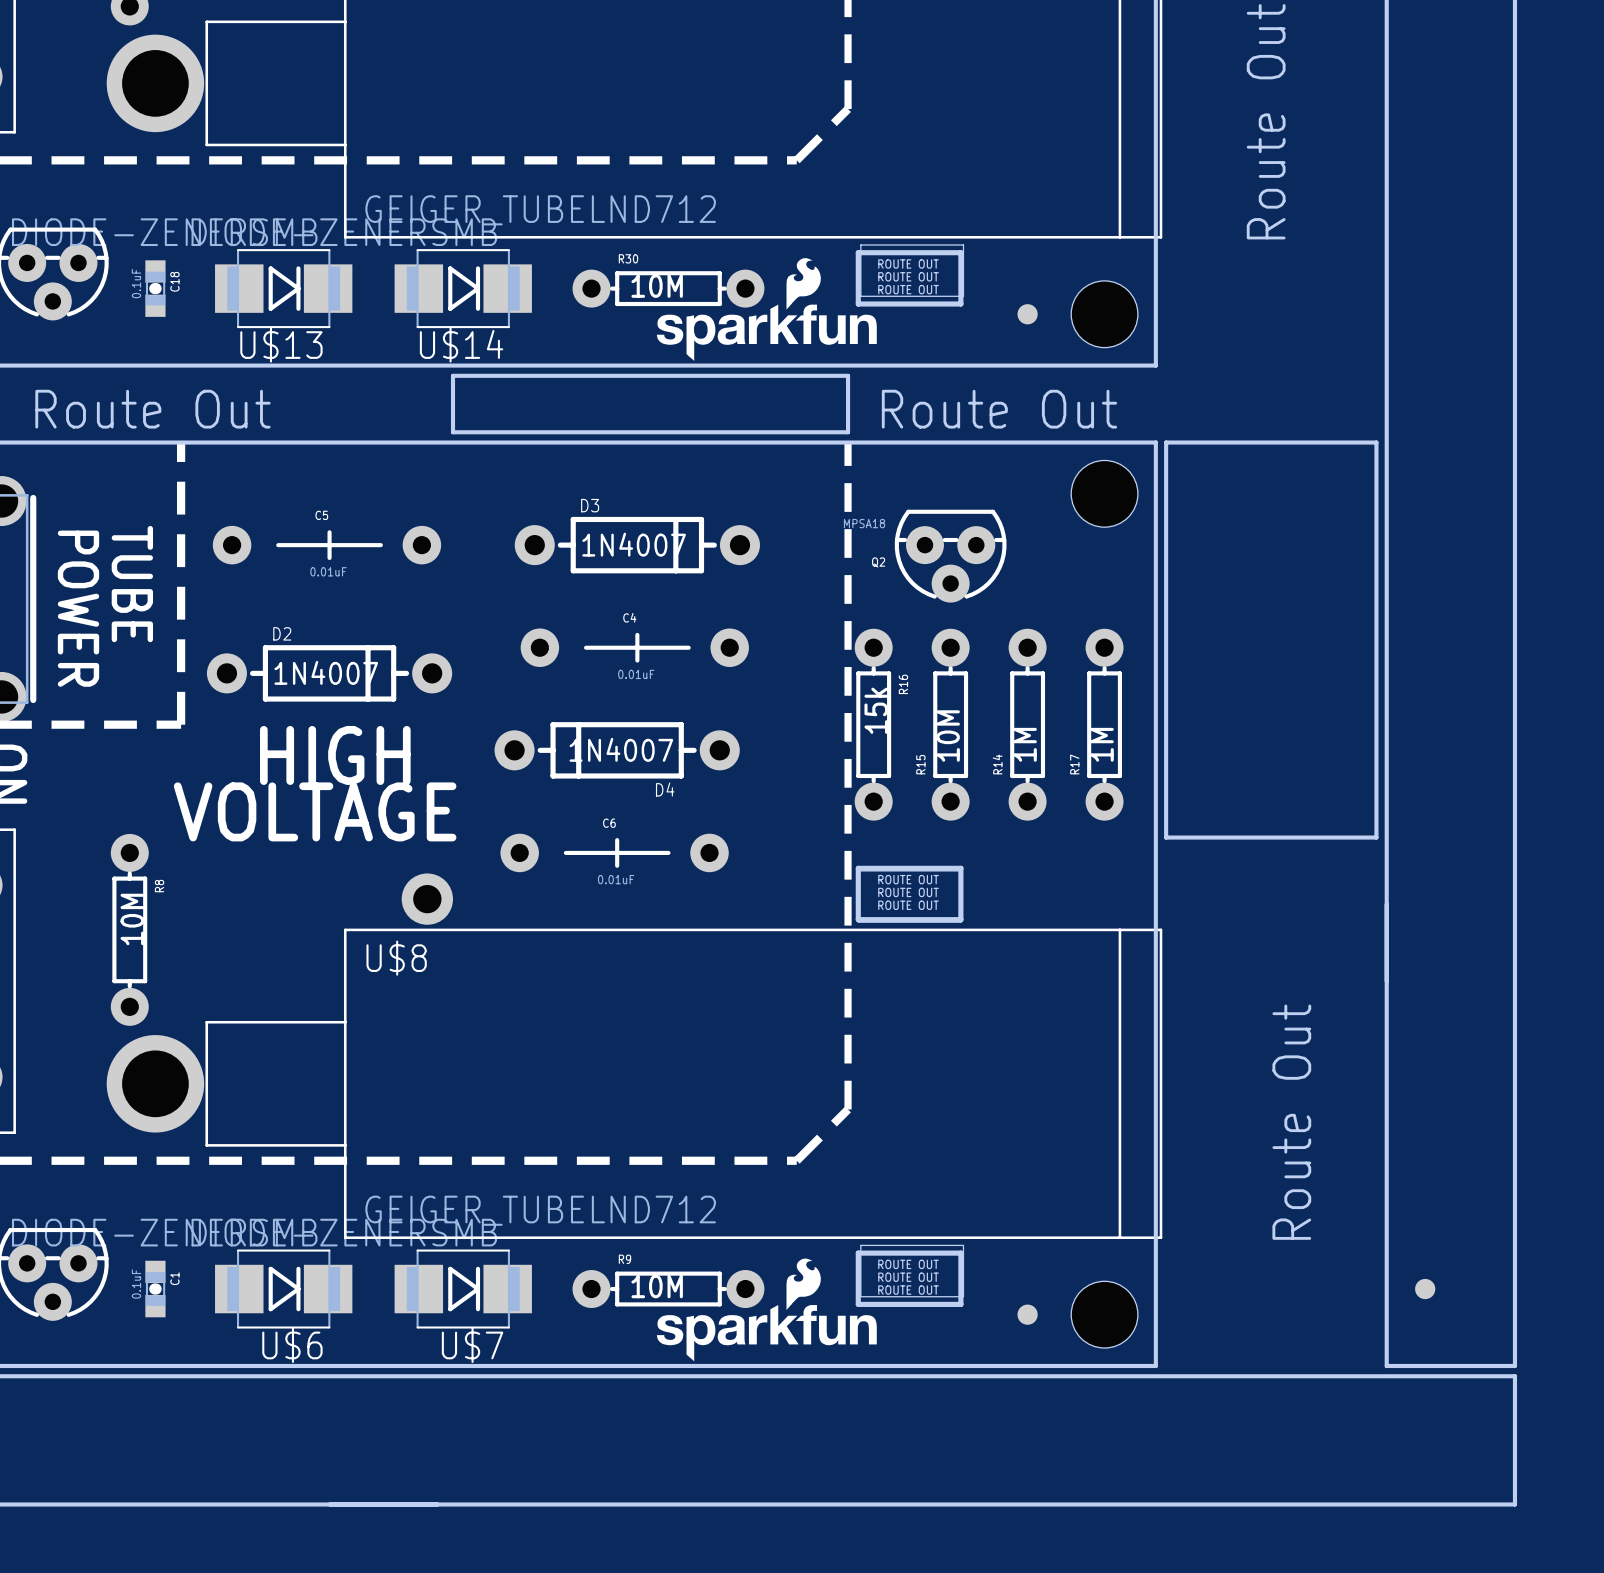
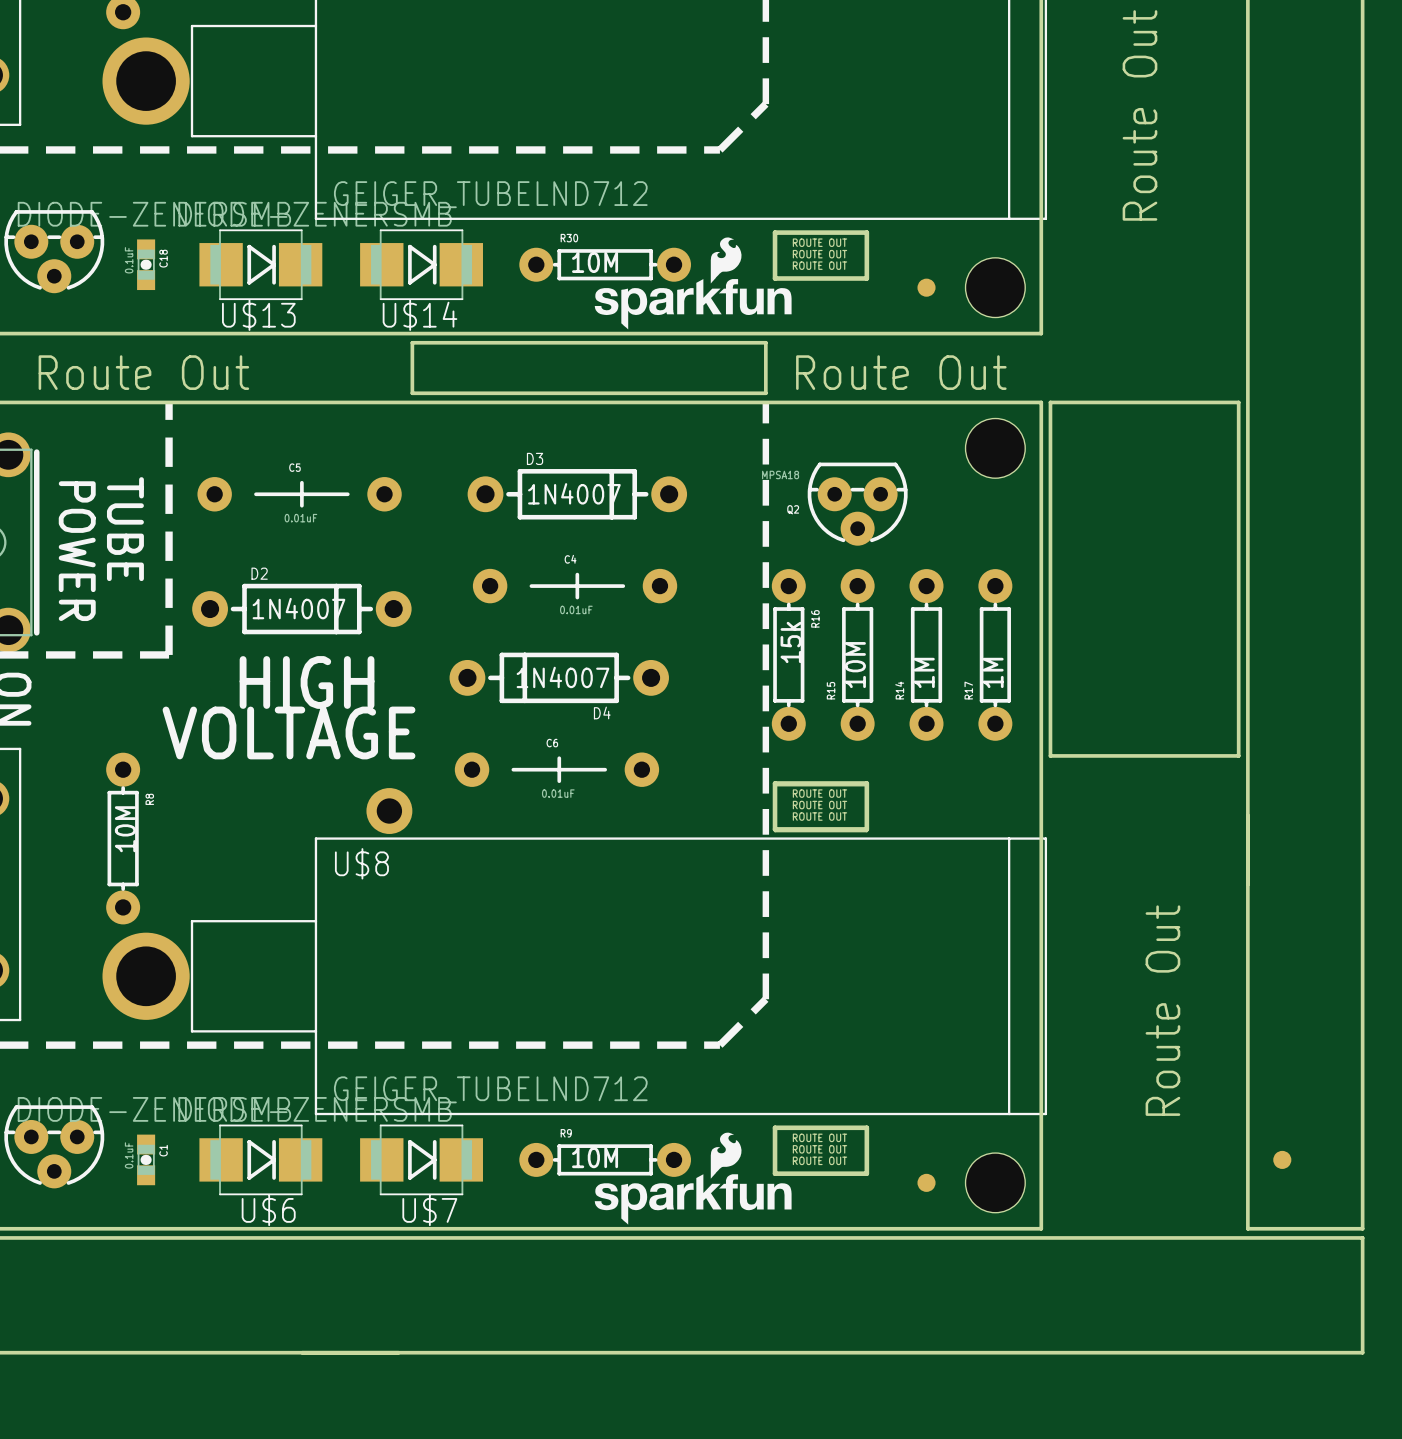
board edge: (860, 245) (860, 296) (963, 296) (963, 245) (860, 245) -> none
board edge: (860, 1245) (963, 1245) (963, 1296) (860, 1296) (860, 1245) -> none

